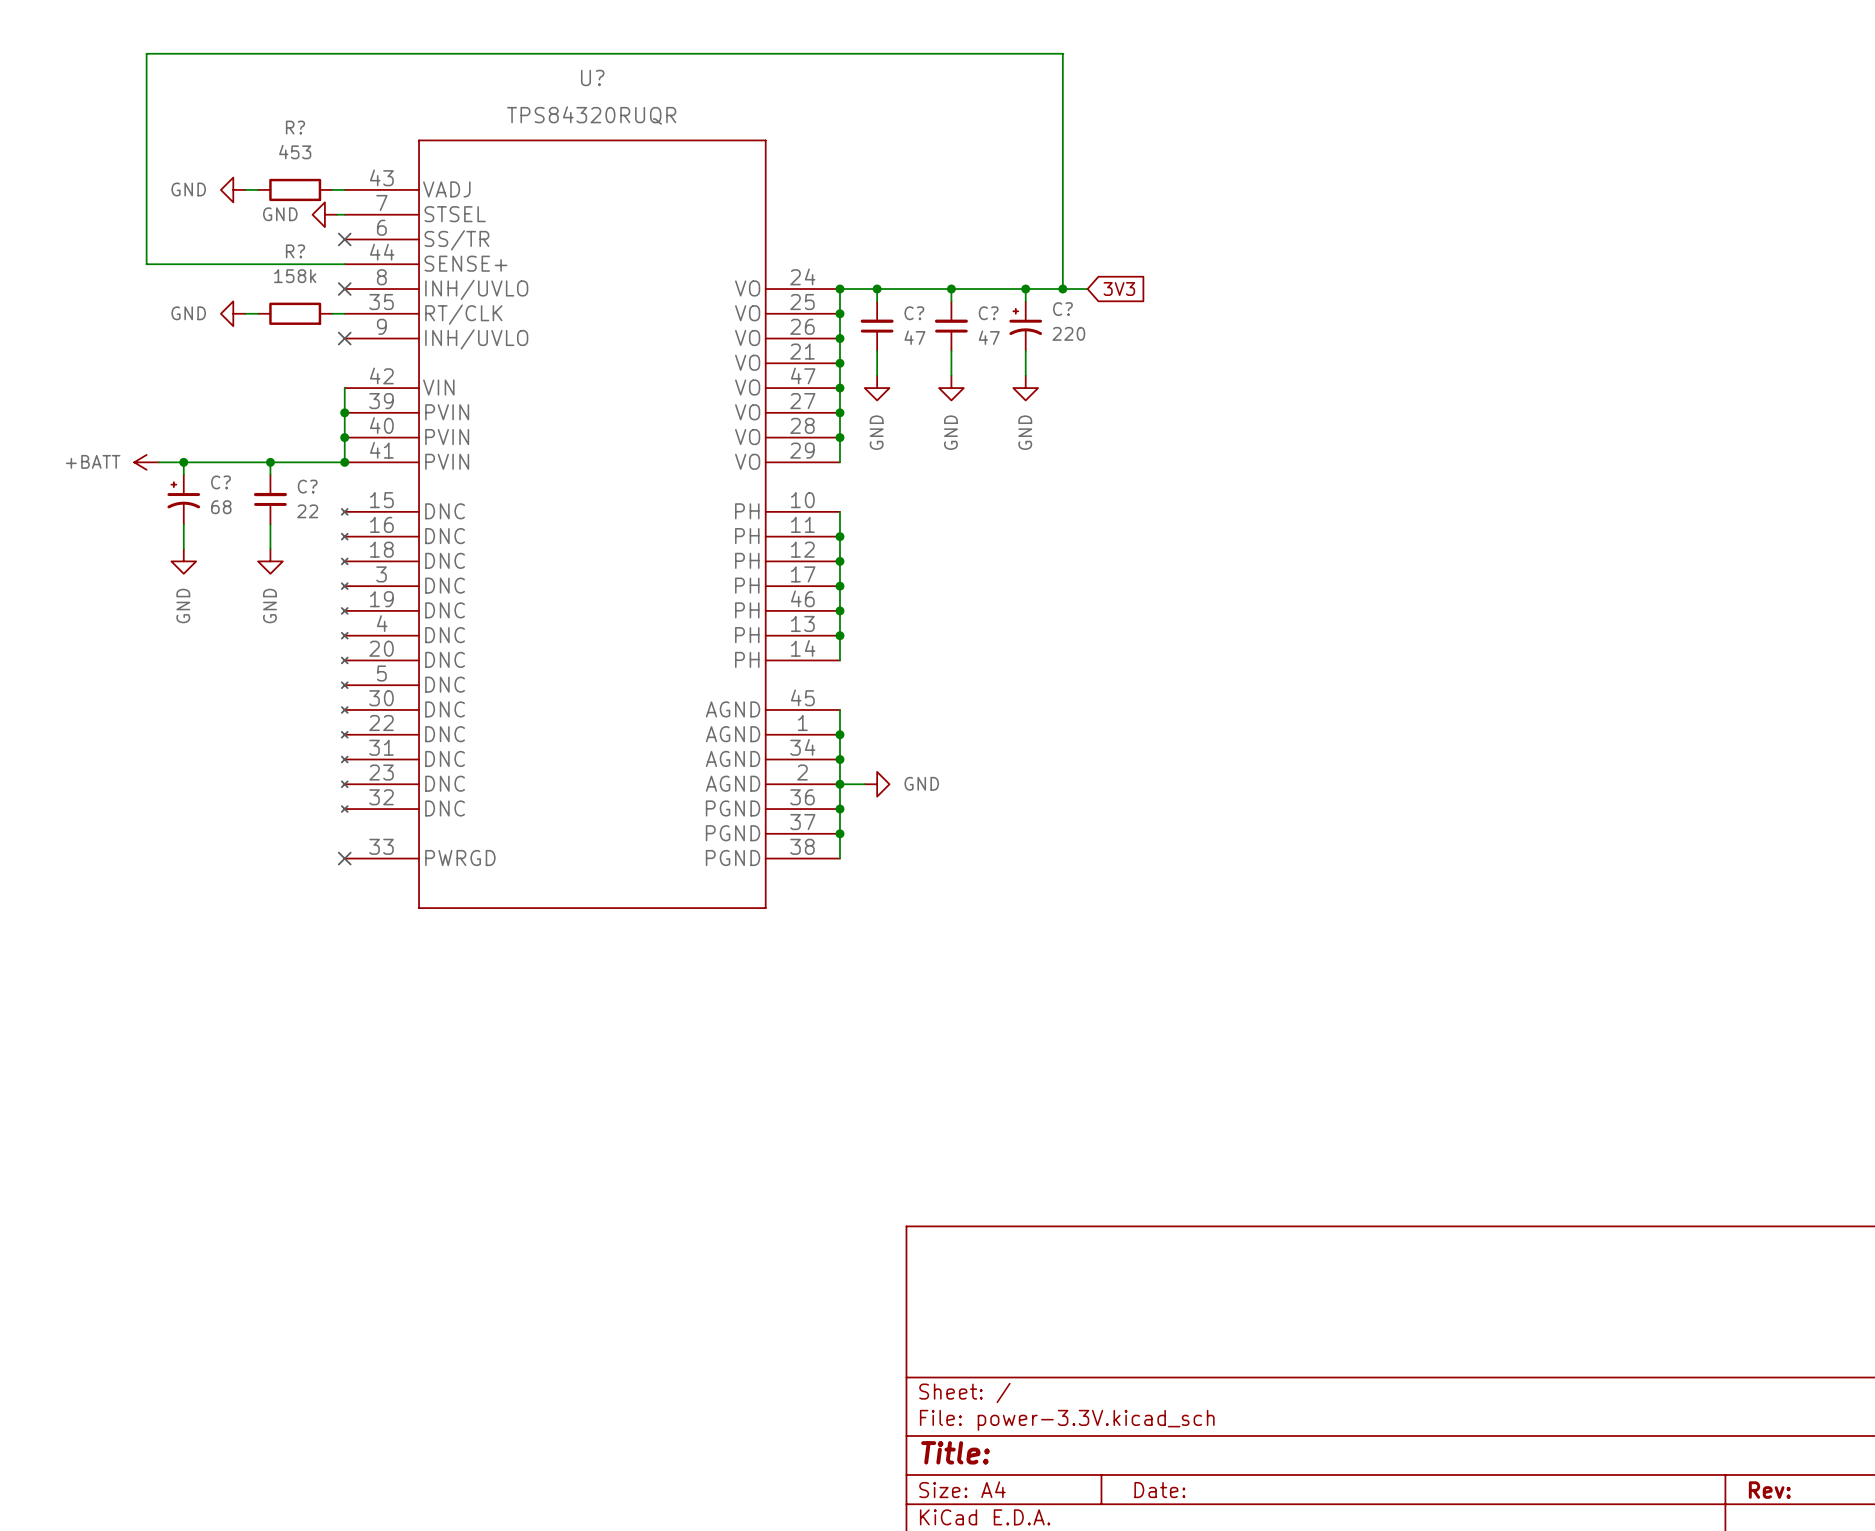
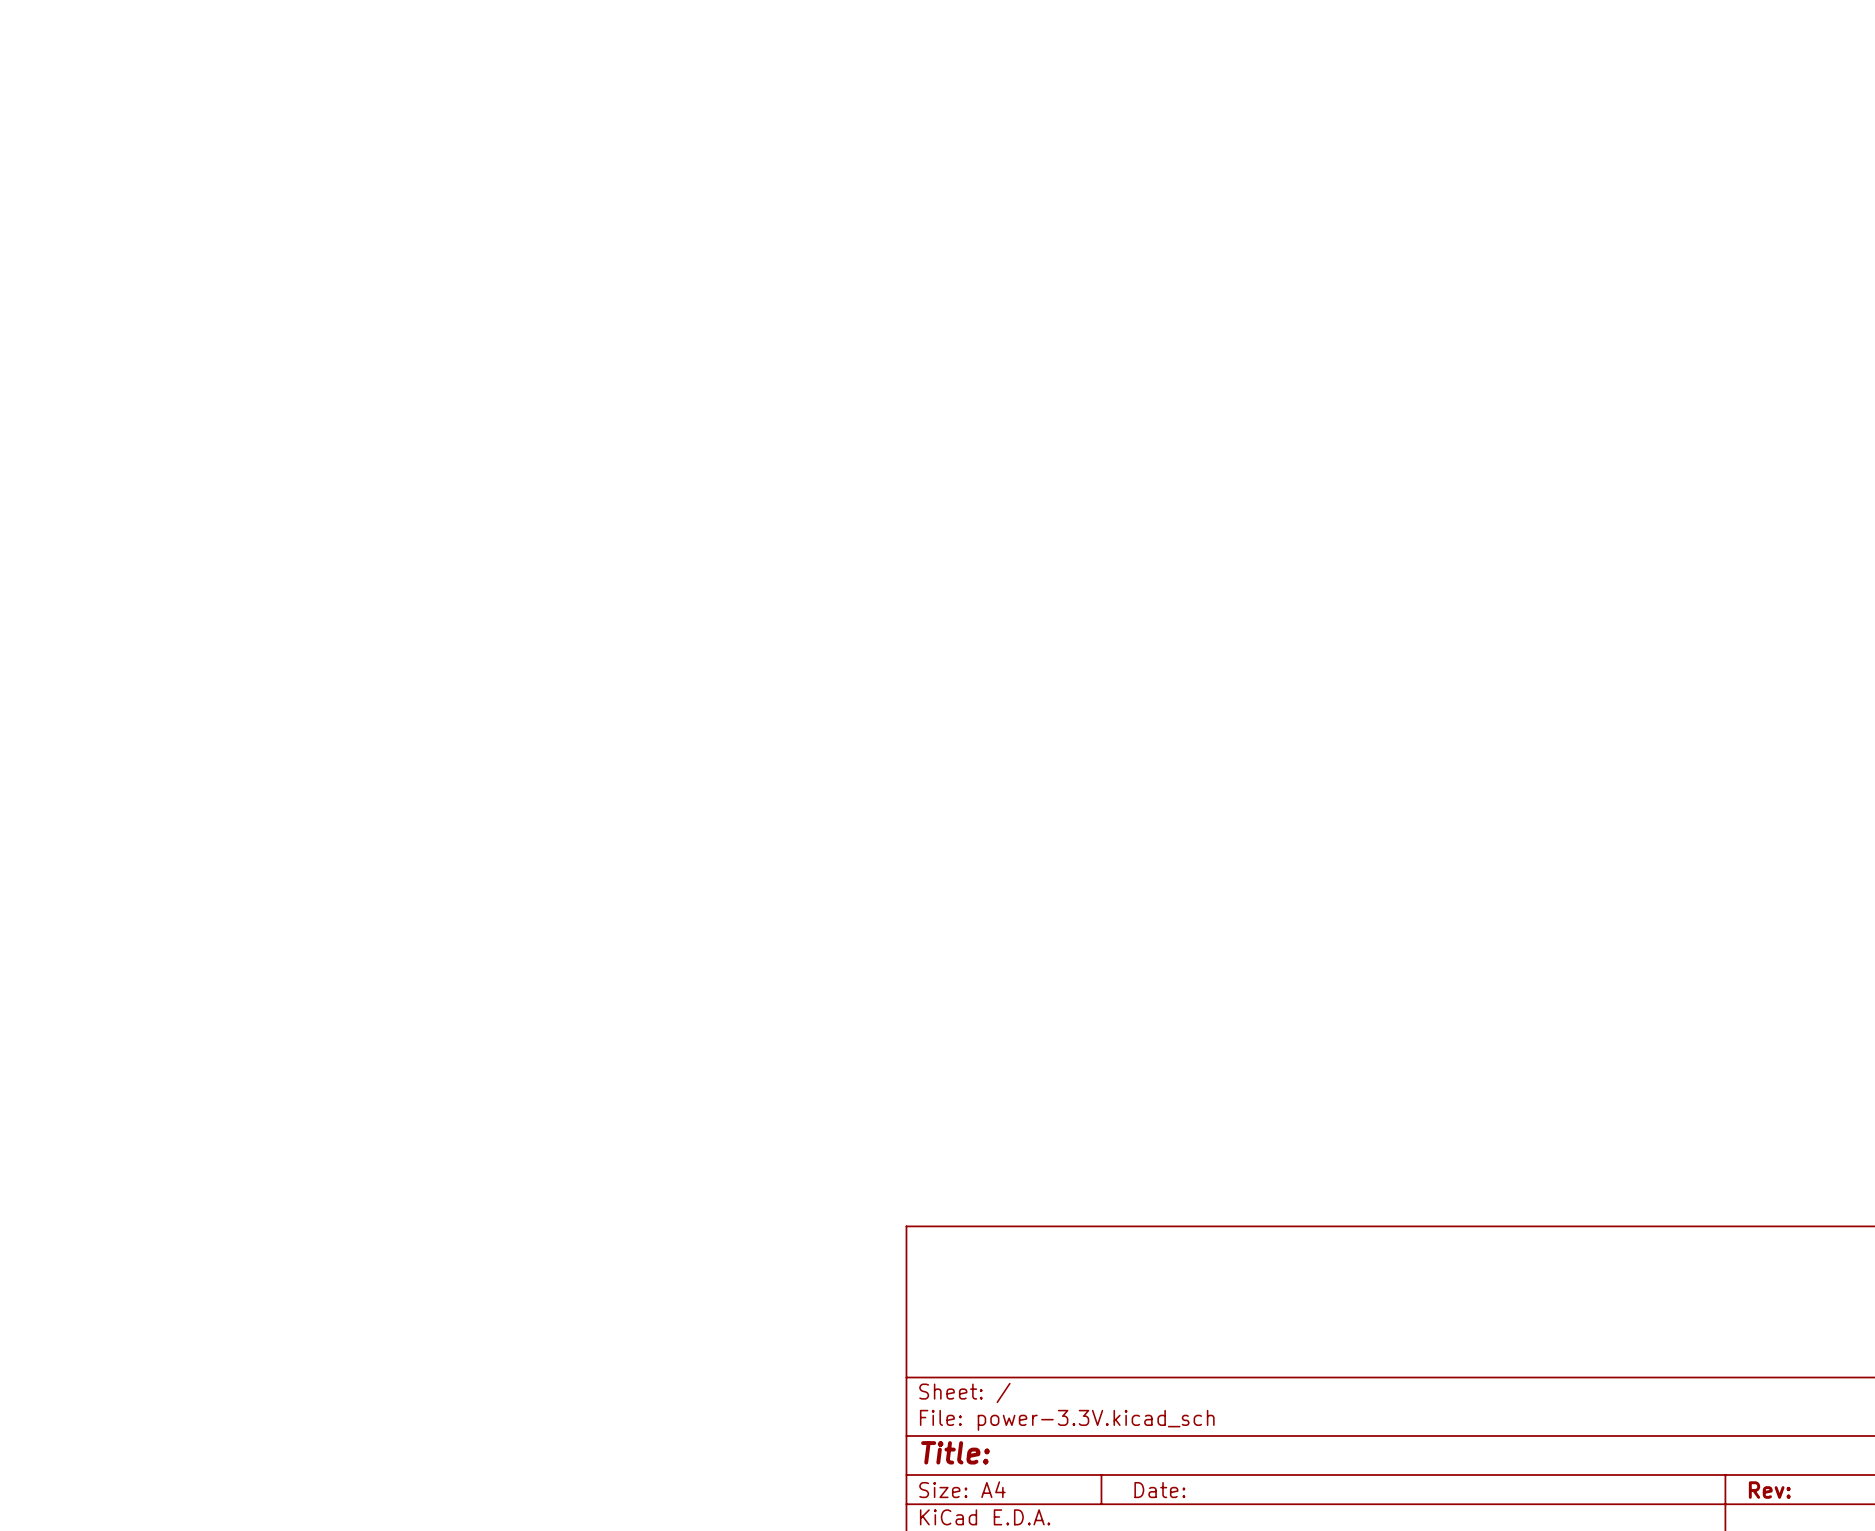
power symbol: GND (233, 189) -> none
wire: (245, 189) (258, 189) -> none
R?: 453 (295, 189) -> none
wire: (332, 189) (344, 189) -> none
power symbol: GND (324, 214) -> none
wire: (337, 214) (344, 214) -> none
no-connect mark: (344, 239) -> none
wire: (344, 264) (146, 264) (146, 53) (1062, 53) (1062, 289) -> none
no-connect mark: (344, 289) -> none
junction: (839, 289) -> none
wire: (877, 289) (877, 301) -> none
junction: (877, 289) -> none
wire: (951, 289) (951, 301) -> none
junction: (951, 289) -> none
wire: (1025, 289) (1025, 301) -> none
junction: (1025, 289) -> none
junction: (1062, 289) -> none
wire: (1087, 289) (839, 289) (839, 462) -> none
global label: 3V3 (1119, 289) -> none
power symbol: GND (233, 313) -> none
wire: (245, 313) (258, 313) -> none
R?: 158k (295, 313) -> none
wire: (332, 313) (344, 313) -> none
junction: (839, 313) -> none
C?: 47 (877, 326) -> none
C?: 47 (951, 326) -> none
C?: 220 (1025, 326) -> none
no-connect mark: (344, 338) -> none
junction: (839, 338) -> none
wire: (877, 350) (877, 375) -> none
wire: (951, 350) (951, 375) -> none
wire: (1025, 350) (1025, 375) -> none
junction: (839, 363) -> none
wire: (344, 388) (344, 462) (159, 462) -> none
junction: (839, 388) -> none
power symbol: GND (877, 388) -> none
power symbol: GND (951, 388) -> none
power symbol: GND (1025, 388) -> none
junction: (344, 412) -> none
junction: (839, 412) -> none
junction: (344, 437) -> none
junction: (839, 437) -> none
power symbol: +BATT (146, 462) -> none
wire: (183, 462) (183, 474) -> none
junction: (183, 462) -> none
wire: (270, 462) (270, 474) -> none
junction: (270, 462) -> none
junction: (344, 462) -> none
C?: 68 (183, 499) -> none
C?: 22 (270, 499) -> none
wire: (839, 511) (839, 660) -> none
wire: (183, 524) (183, 549) -> none
wire: (270, 524) (270, 549) -> none
U?: TPS84320RUQR (590, 524) -> none
junction: (839, 536) -> none
power symbol: GND (183, 561) -> none
power symbol: GND (270, 561) -> none
junction: (839, 561) -> none
junction: (839, 586) -> none
junction: (839, 610) -> none
junction: (839, 635) -> none
wire: (839, 709) (839, 858) -> none
junction: (839, 734) -> none
junction: (839, 759) -> none
wire: (839, 784) (864, 784) -> none
junction: (839, 784) -> none
power symbol: GND (877, 784) -> none
junction: (839, 809) -> none
junction: (839, 833) -> none
no-connect mark: (344, 858) -> none

